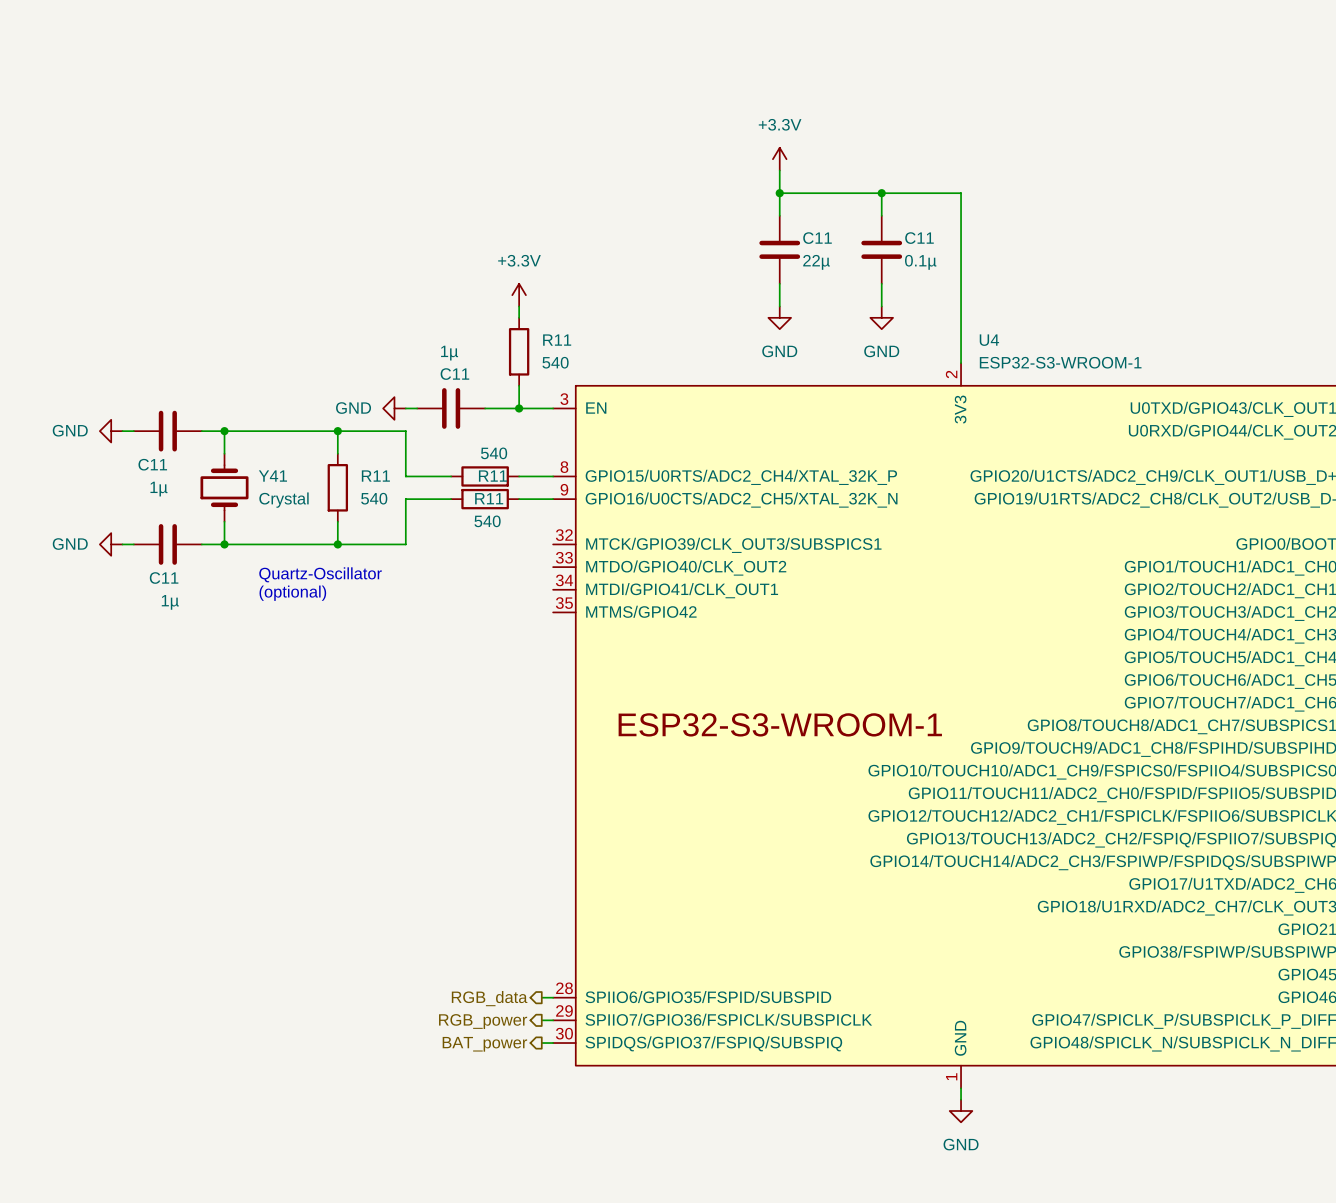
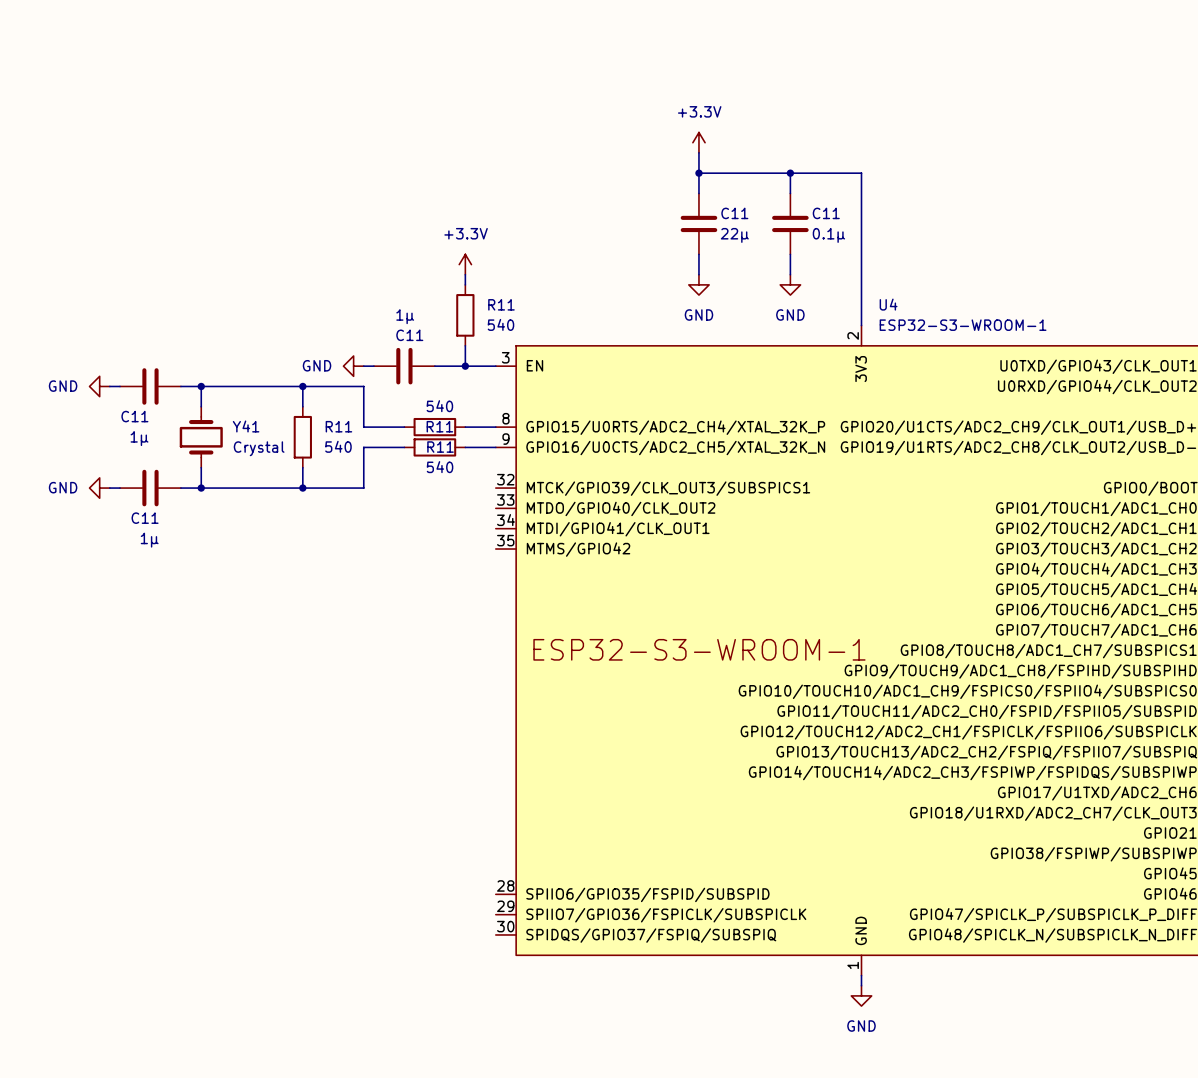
text: Quartz-Oscillator (320, 574) -> none
text: (optional) (292, 593) -> none
wire: (541, 997) (553, 997) -> none
hierarchical label: RGB_data (489, 998) -> none
wire: (541, 1020) (553, 1020) -> none
hierarchical label: RGB_power (483, 1021) -> none
wire: (541, 1043) (553, 1043) -> none
hierarchical label: BAT_power (484, 1044) -> none

